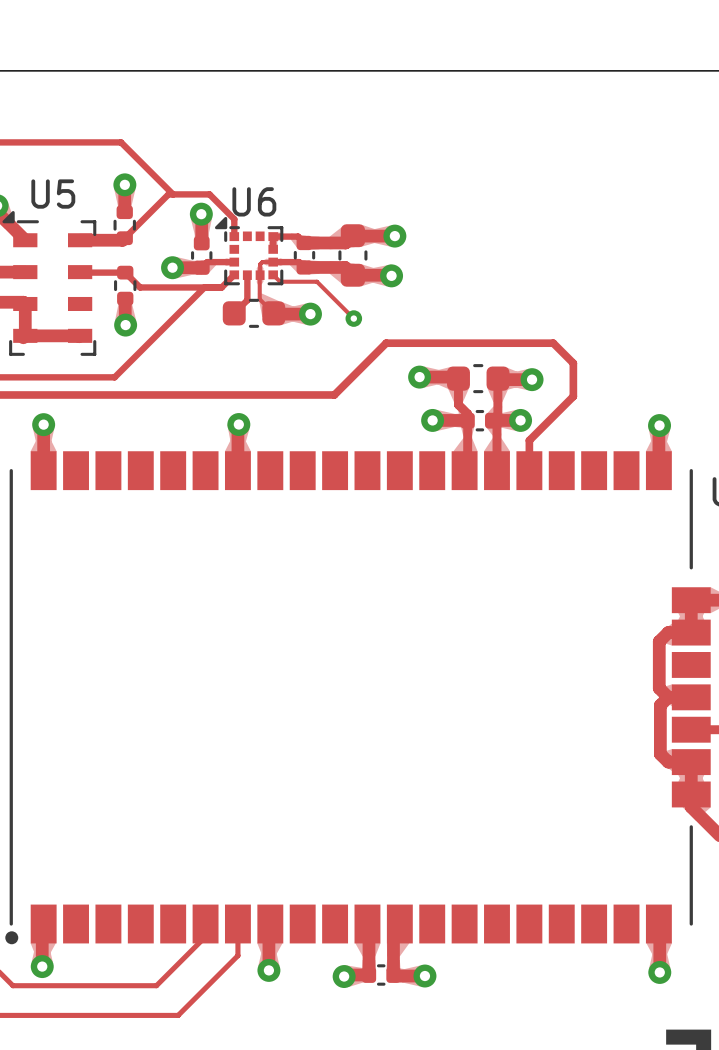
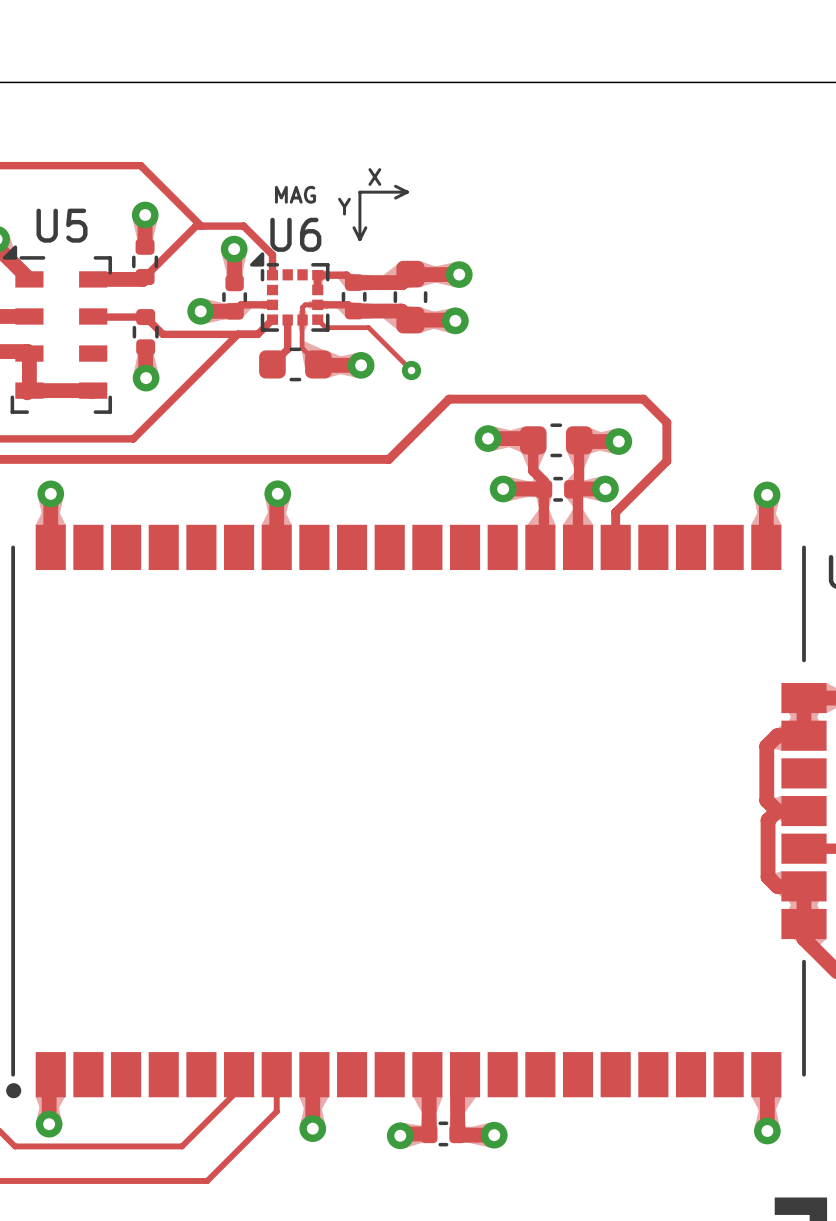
text: none -> X (374, 176)
line: none -> (395, 186) (407, 192)
line: none -> (407, 192) (359, 192) (359, 239)
line: none -> (407, 192) (395, 198)
text: none -> MAG (295, 194)
text: none -> Y (344, 206)
line: none -> (353, 227) (359, 239)
line: none -> (365, 227) (359, 239)

